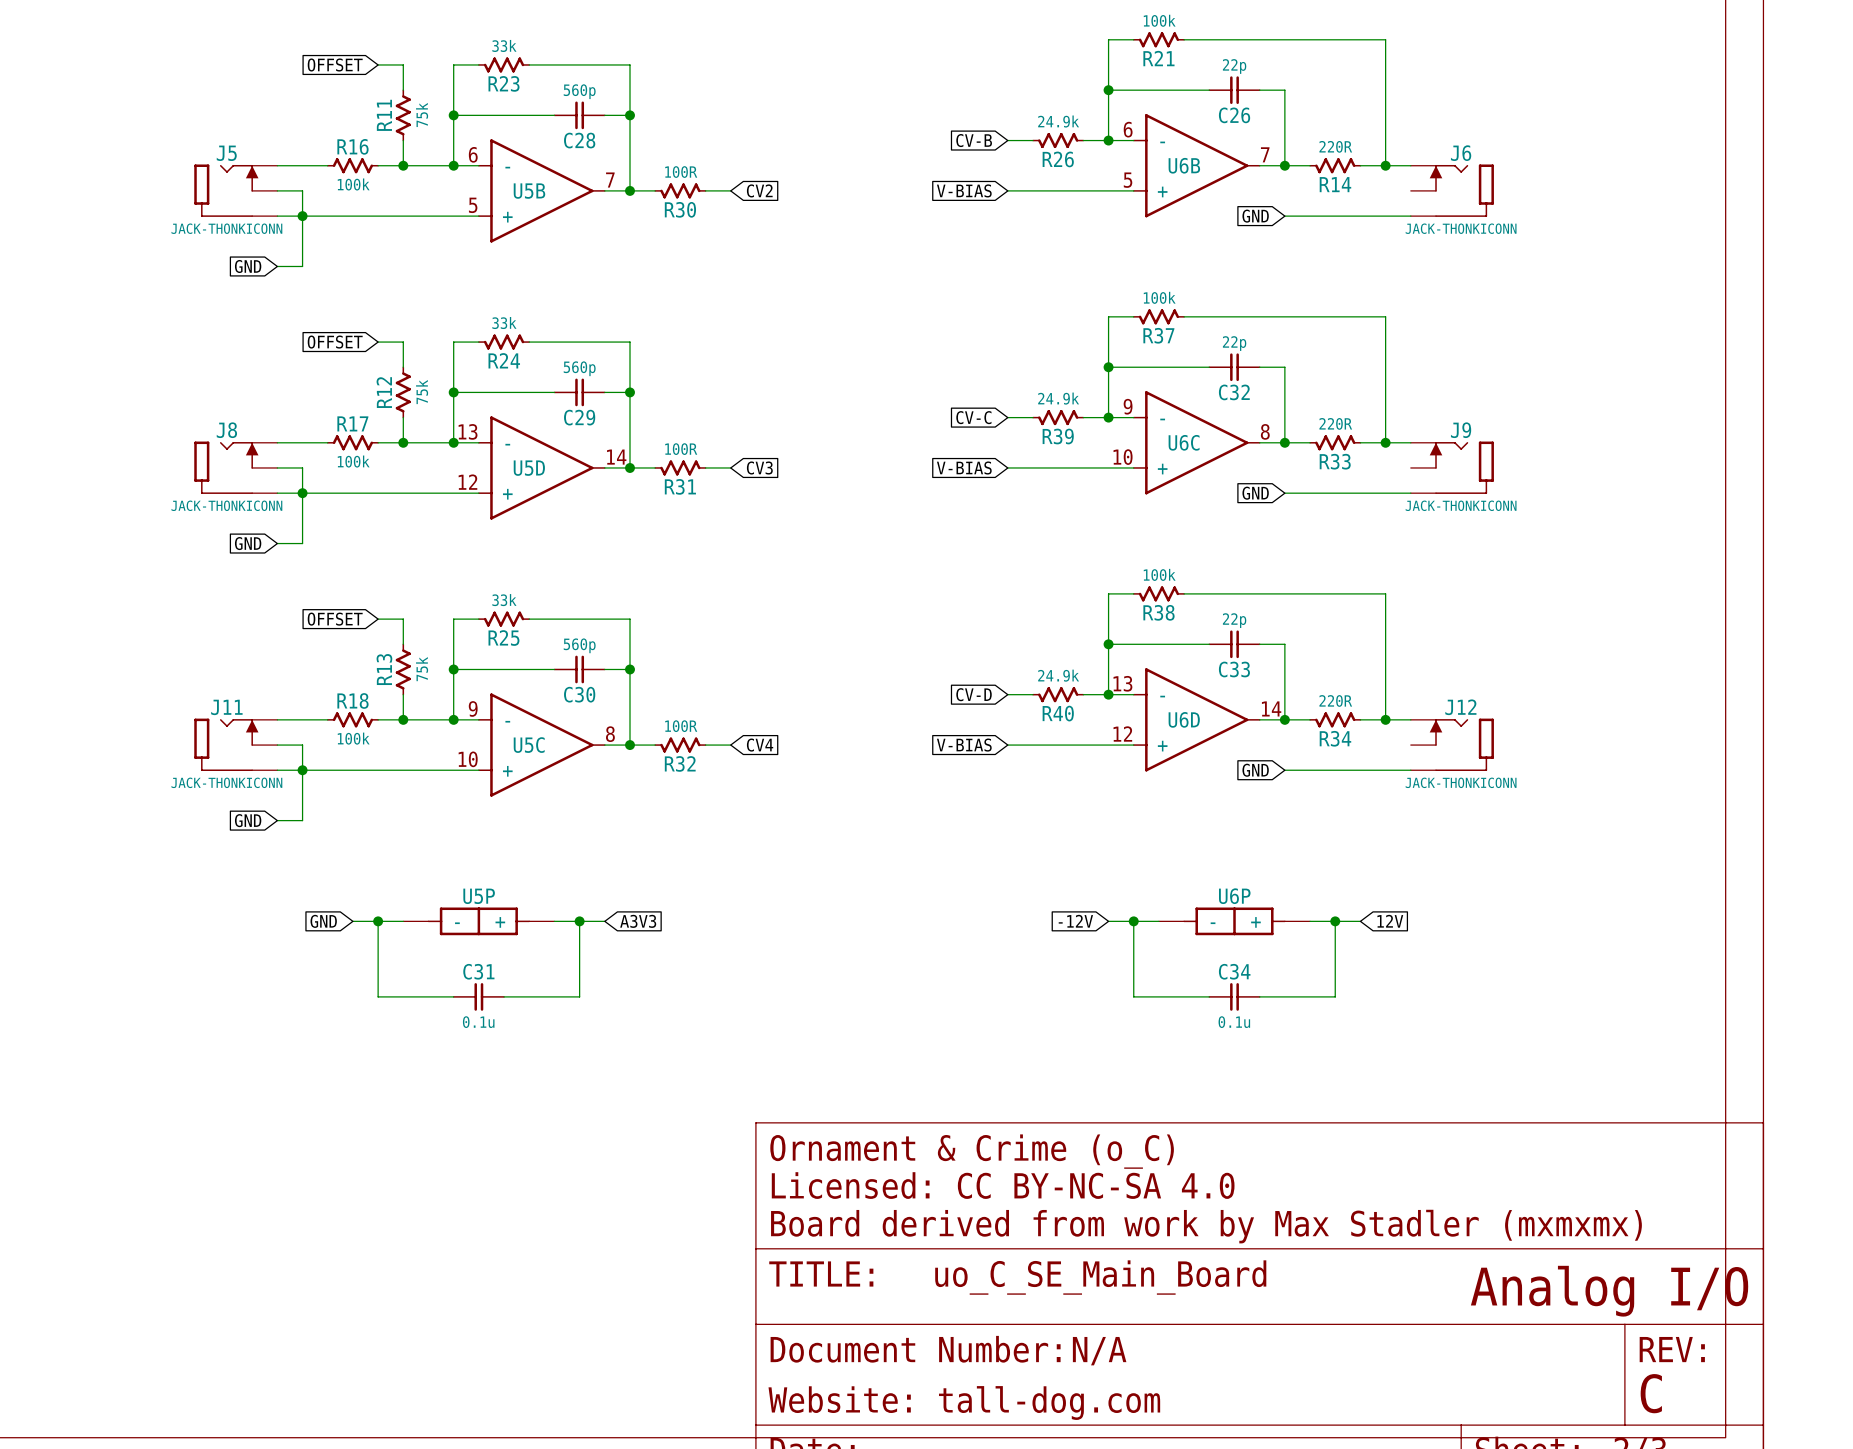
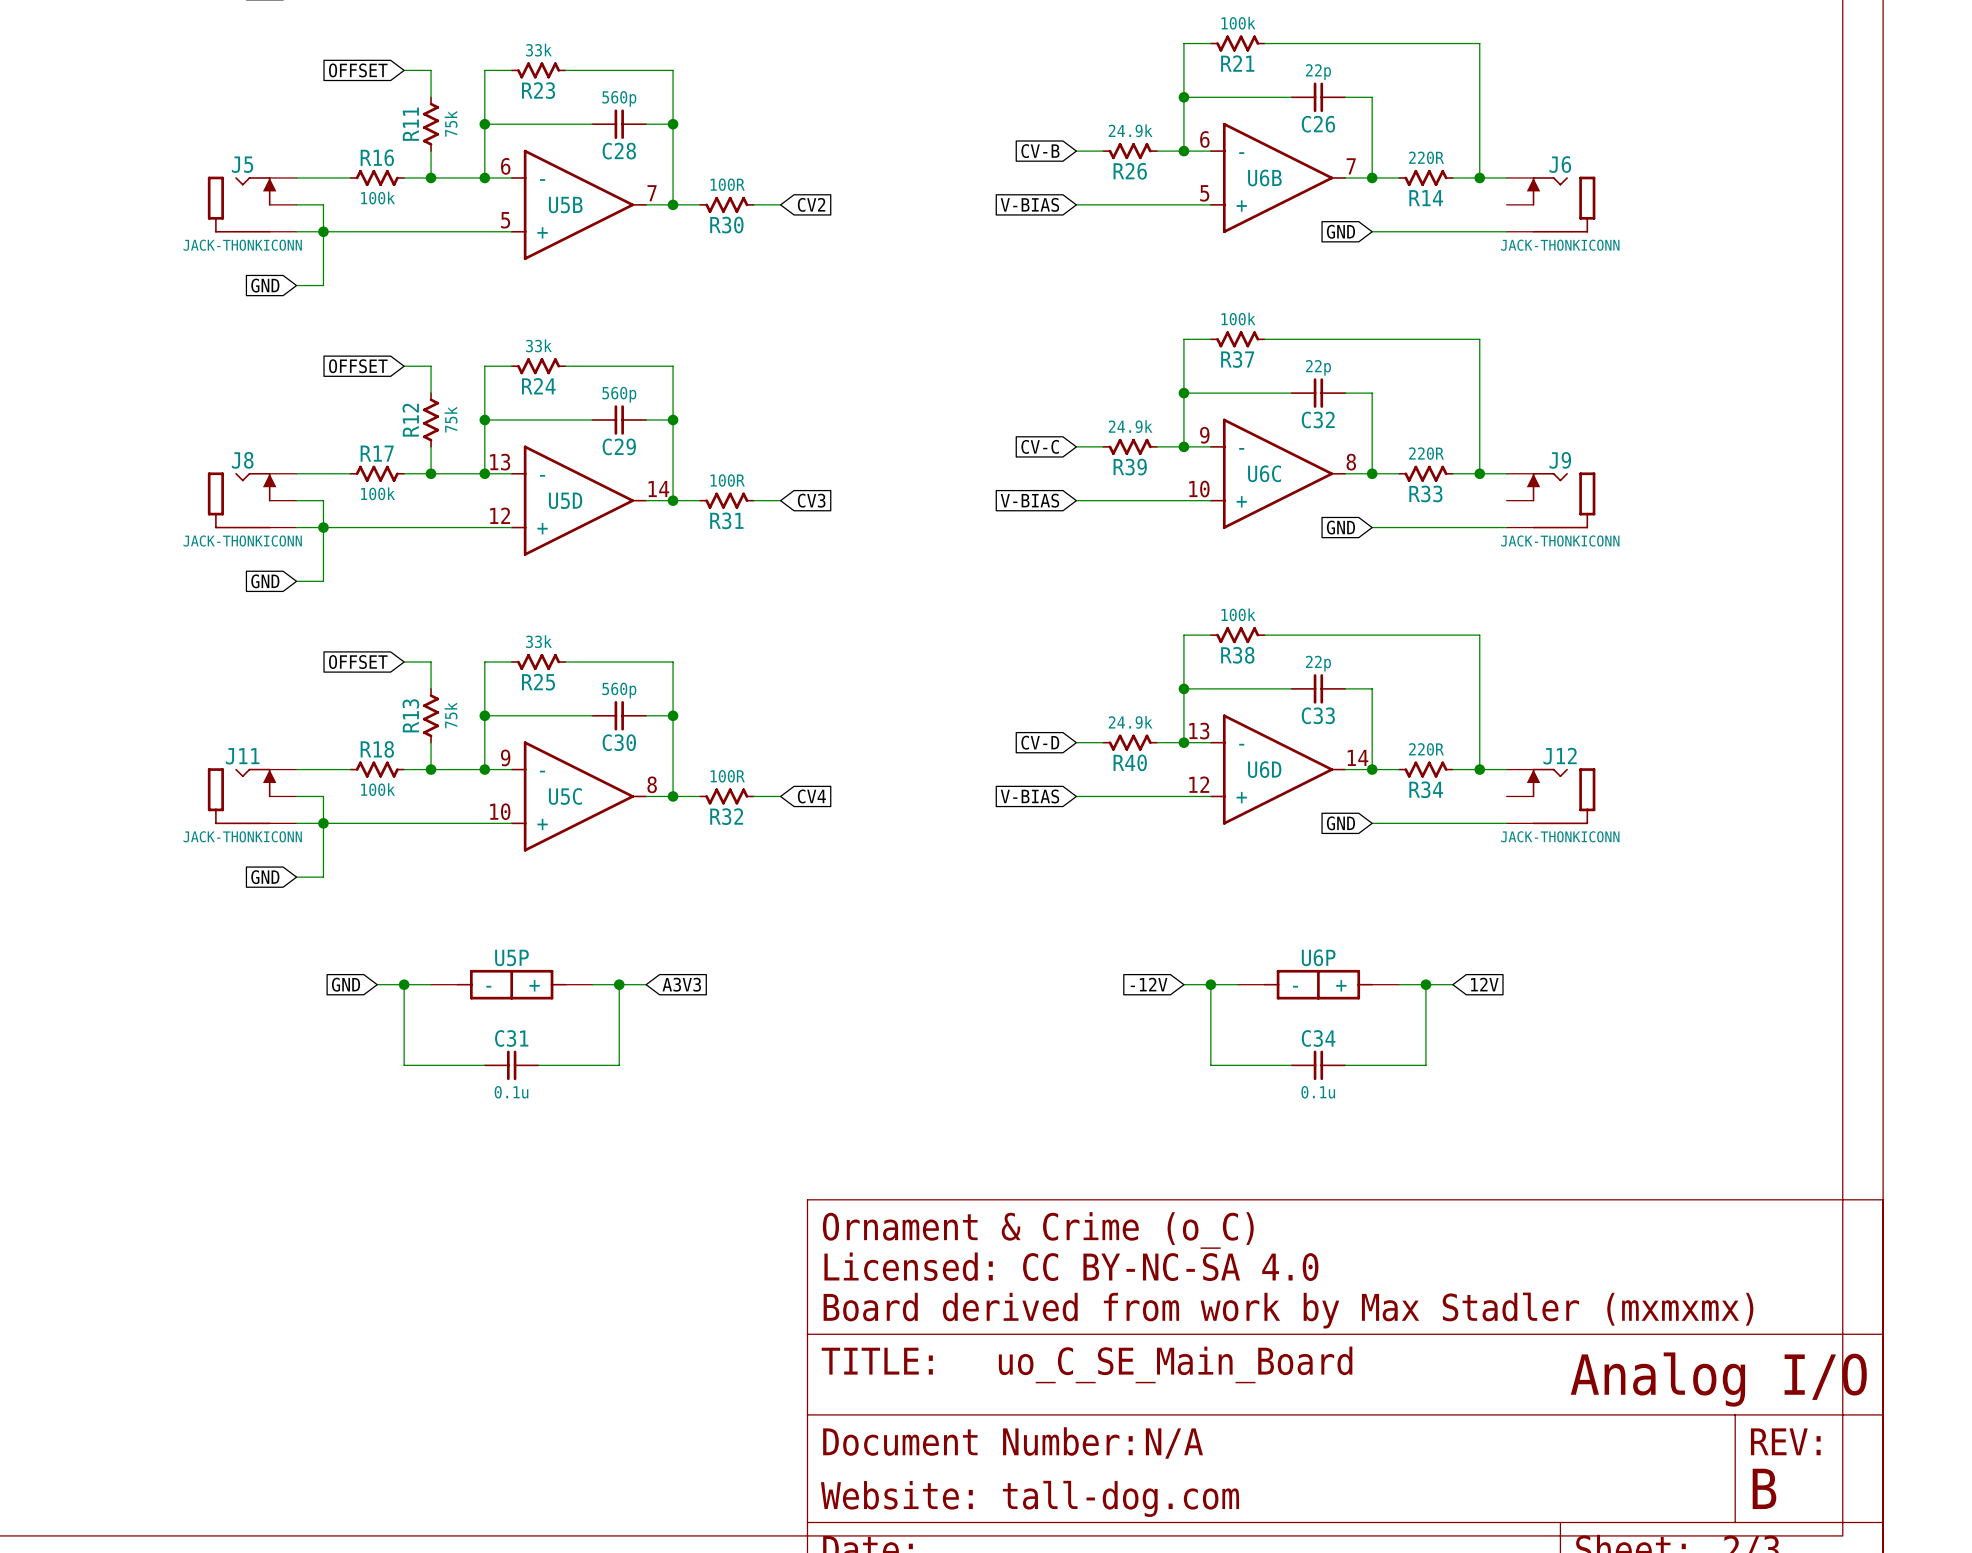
text: C (1651, 1393) -> B (1764, 1488)

